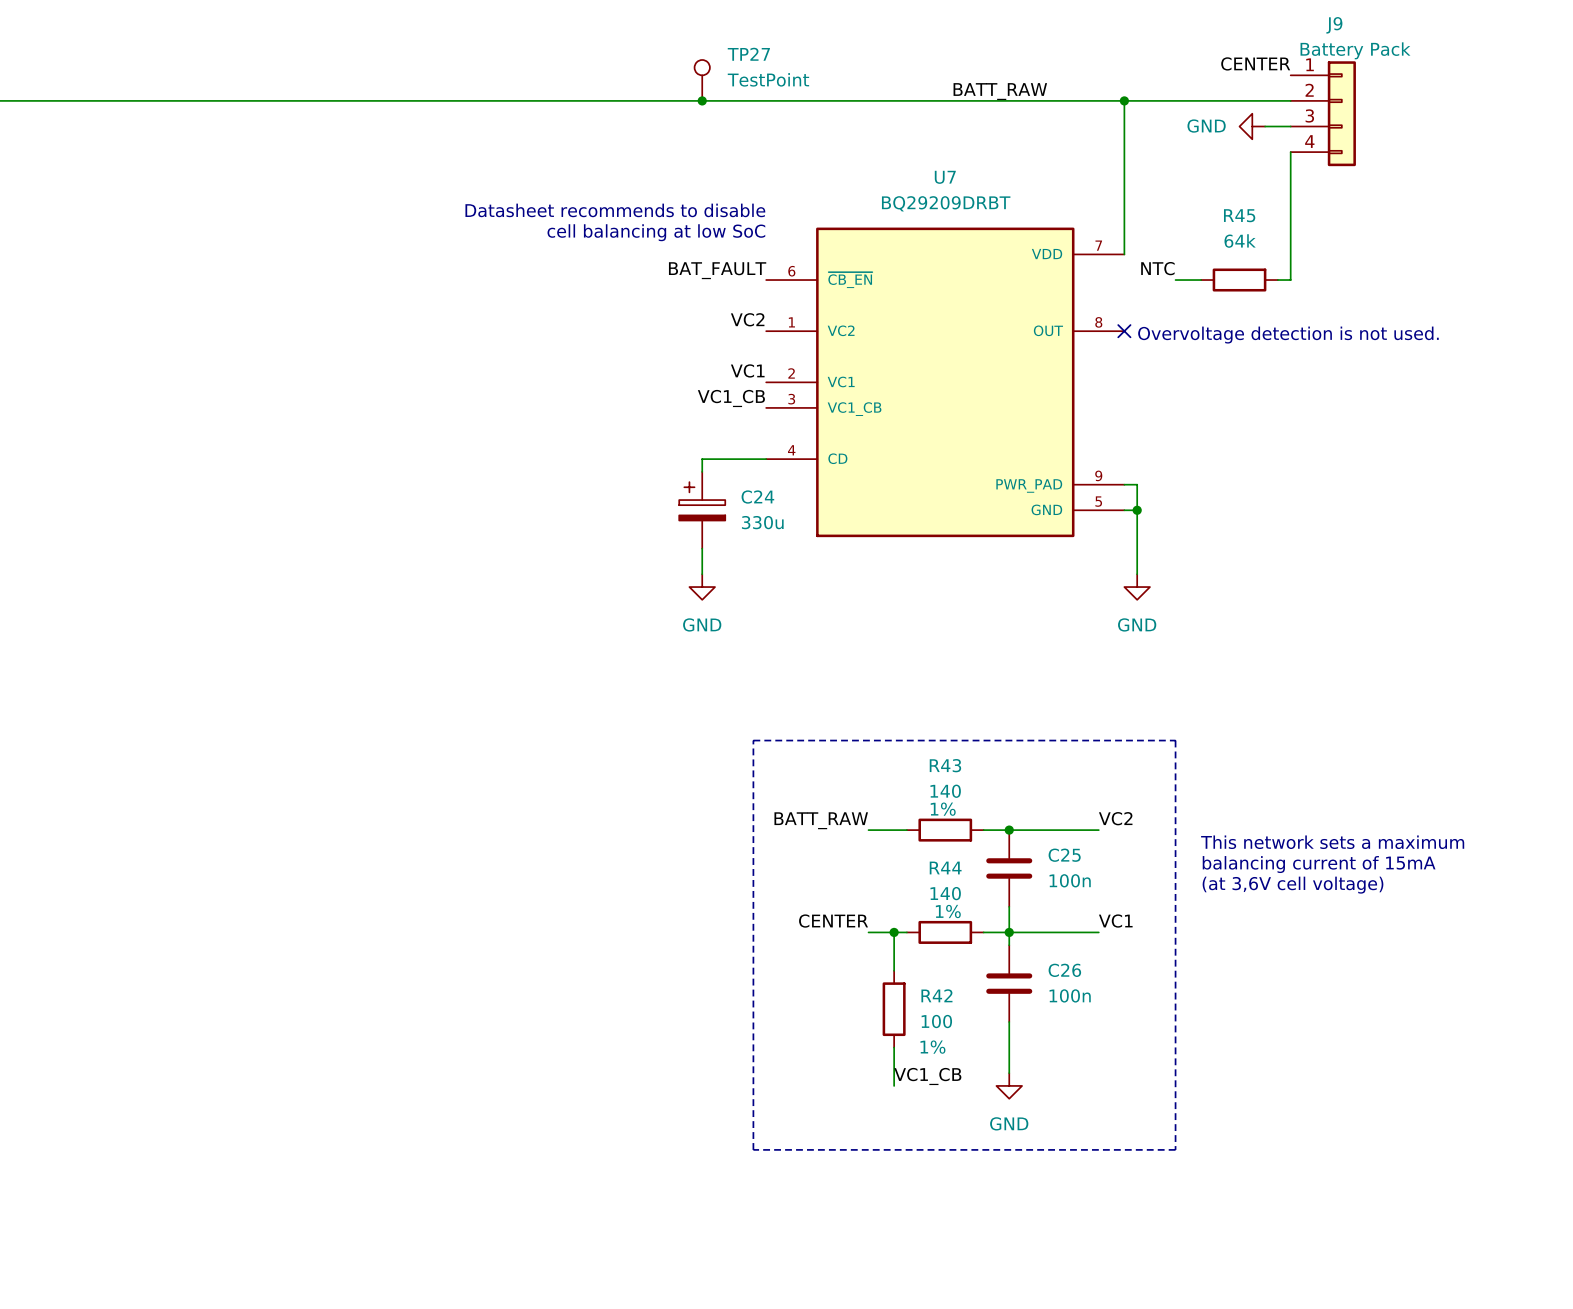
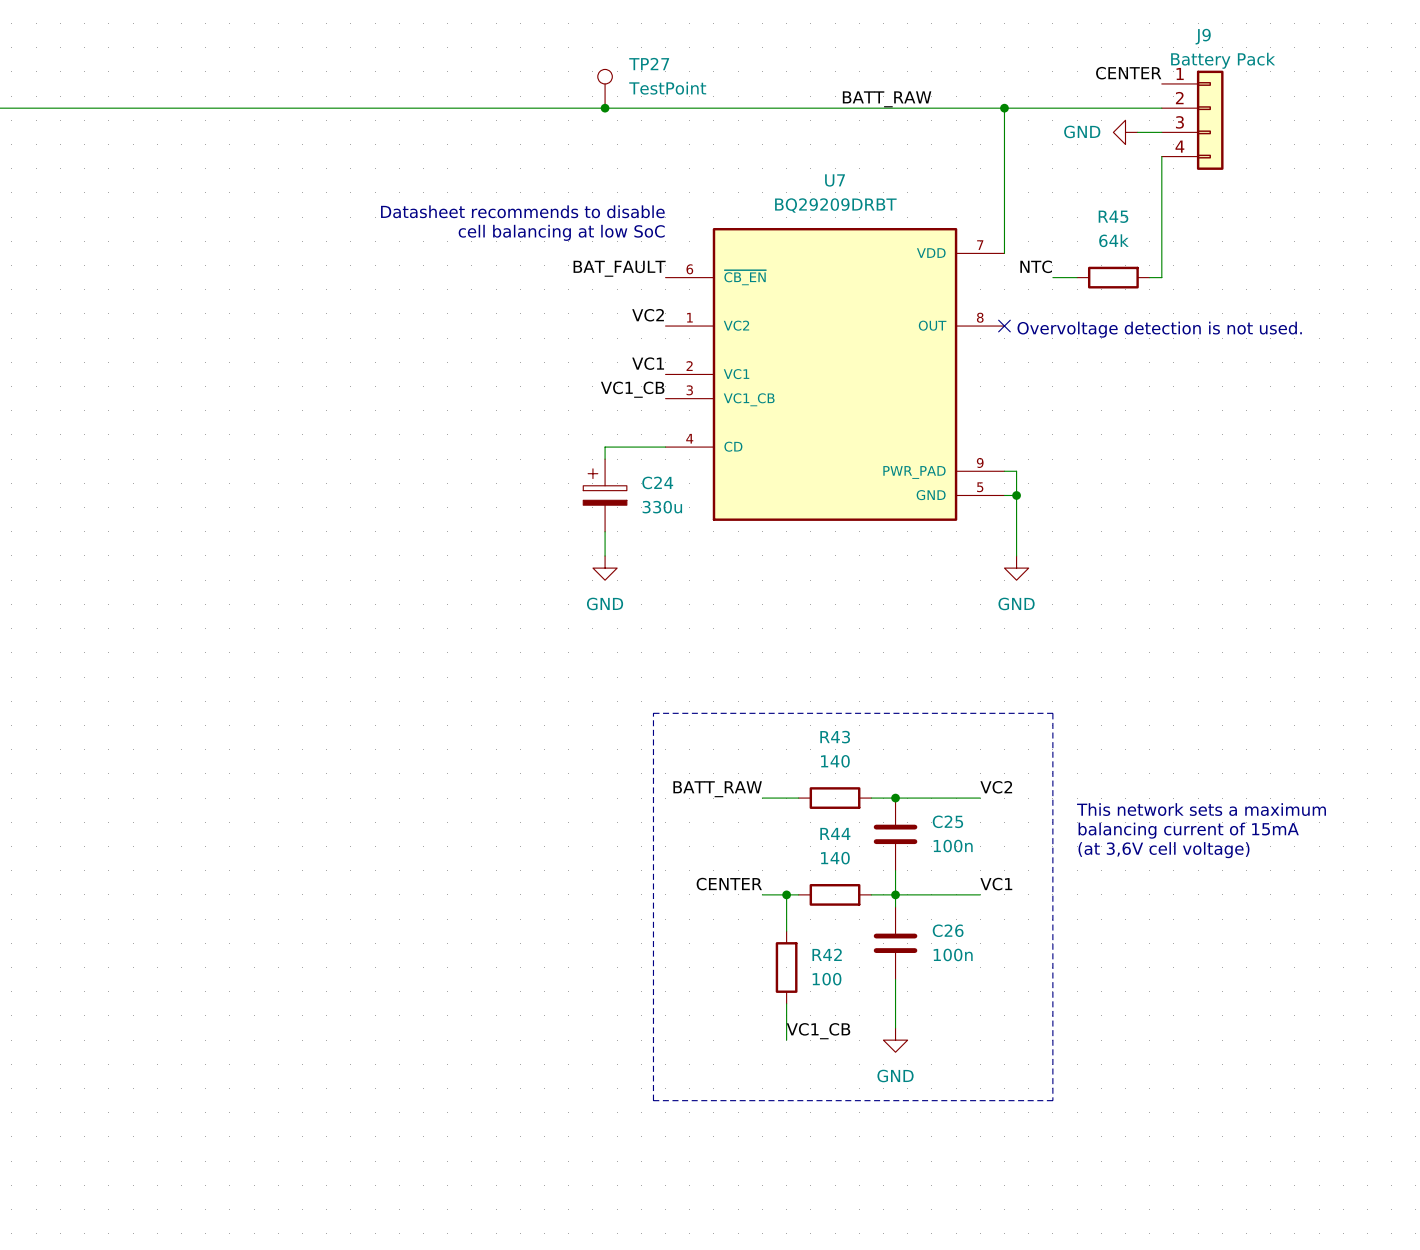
R43 text: 1% (943, 809) -> none
R44 text: 1% (948, 911) -> none
R42 text: 1% (932, 1047) -> none

